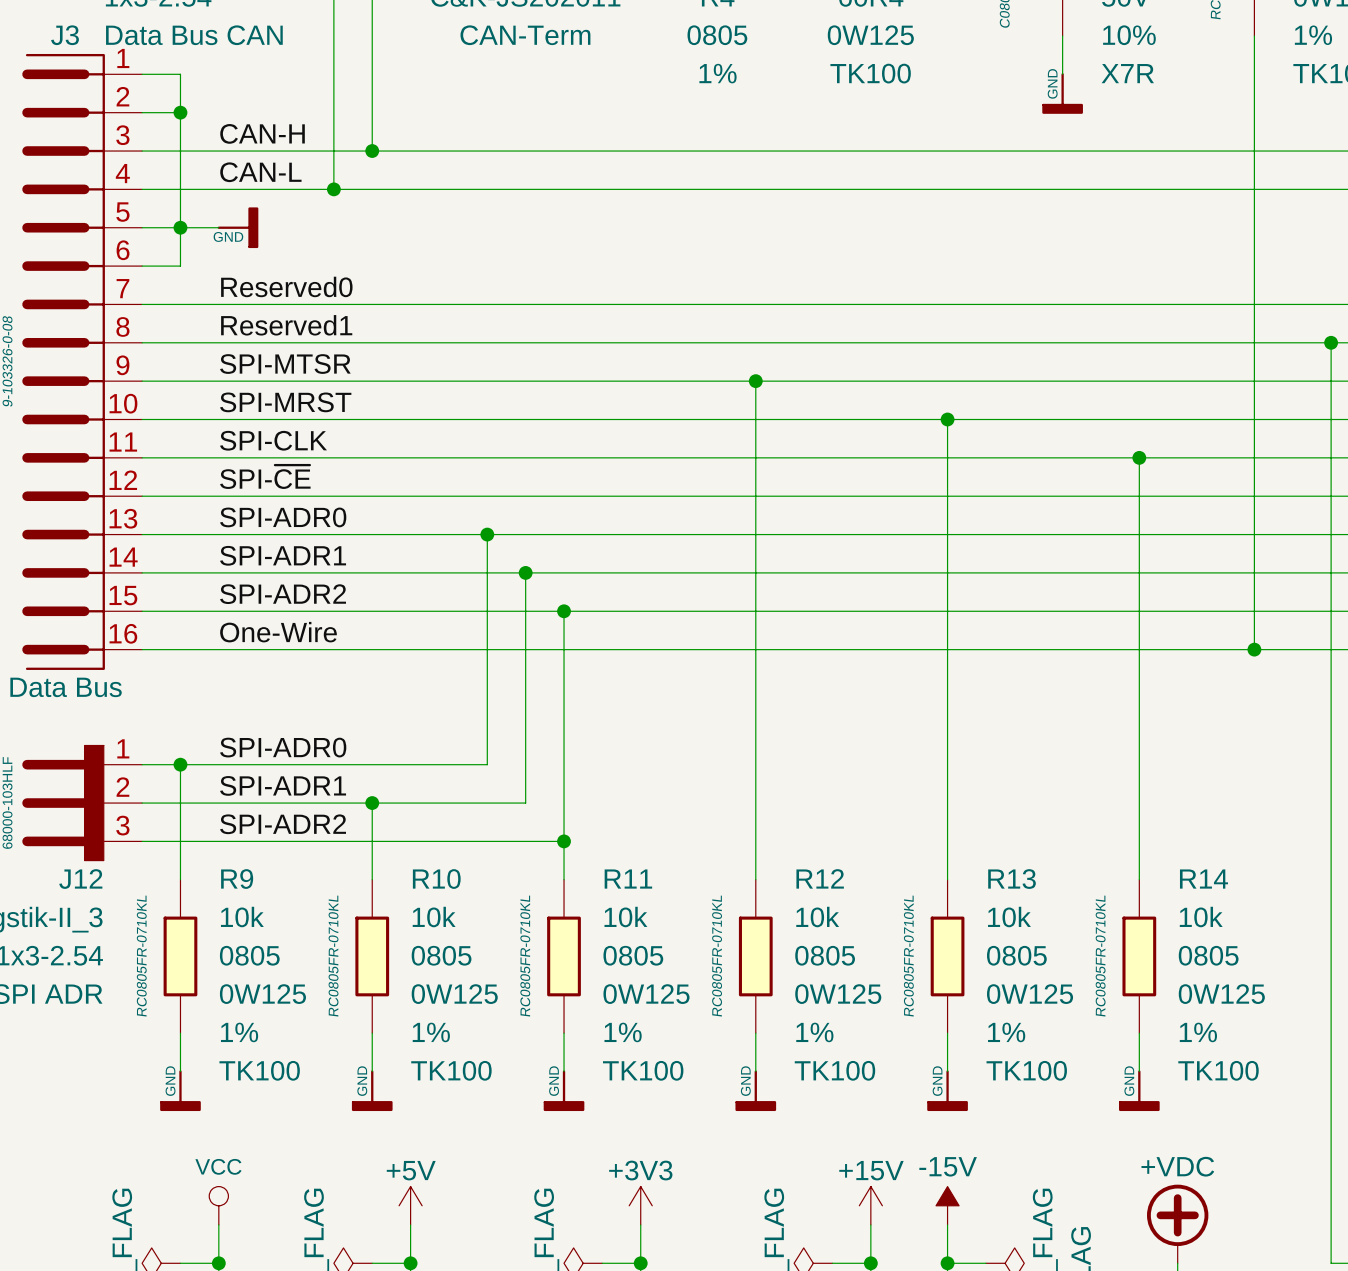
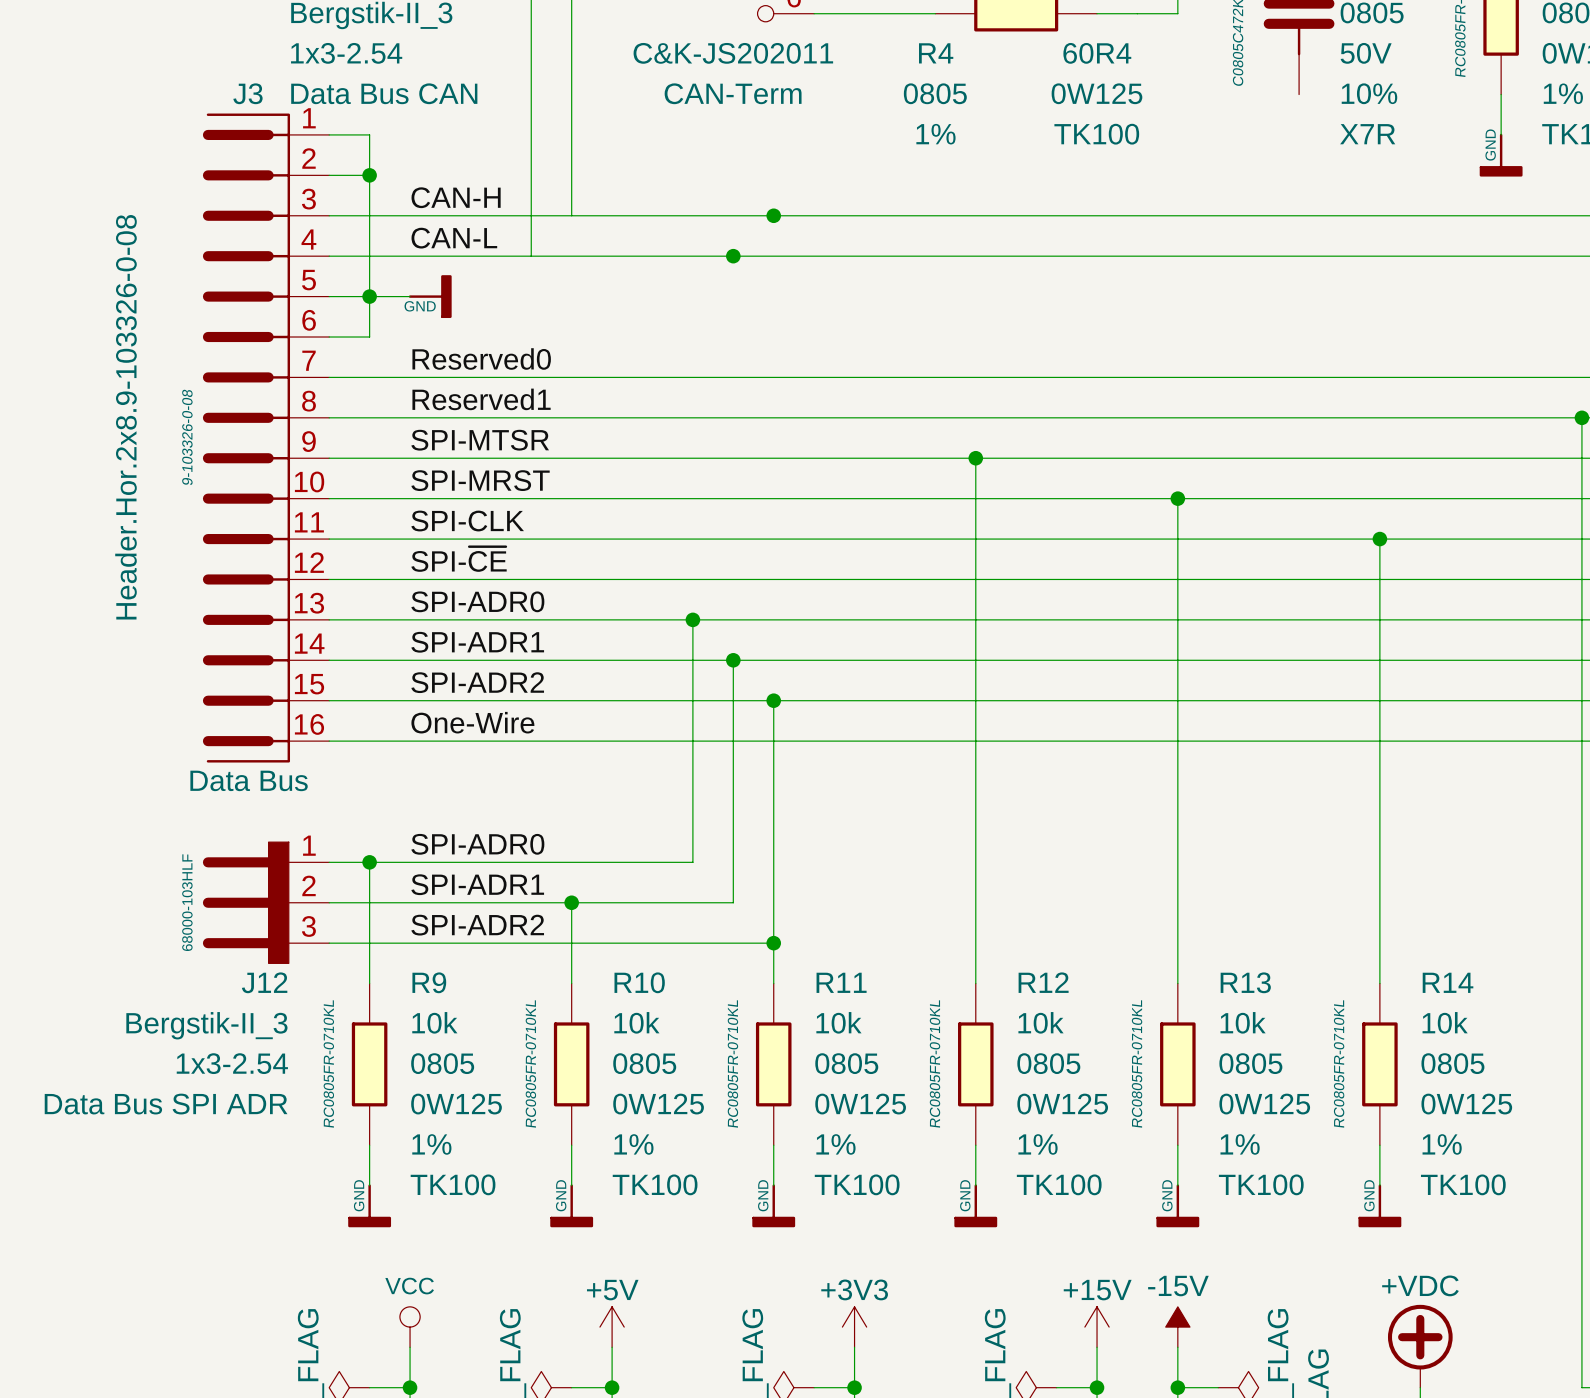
wire: (1062, 35) (1062, 74) -> none
wire: (1254, 74) (1254, 649) -> none
power symbol position: GND (1062, 93) -> GND (1501, 155)
junction: (372, 151) -> none
junction: none -> (773, 215)
junction: (333, 189) -> none
junction: none -> (733, 256)
junction: (1254, 649) -> none

